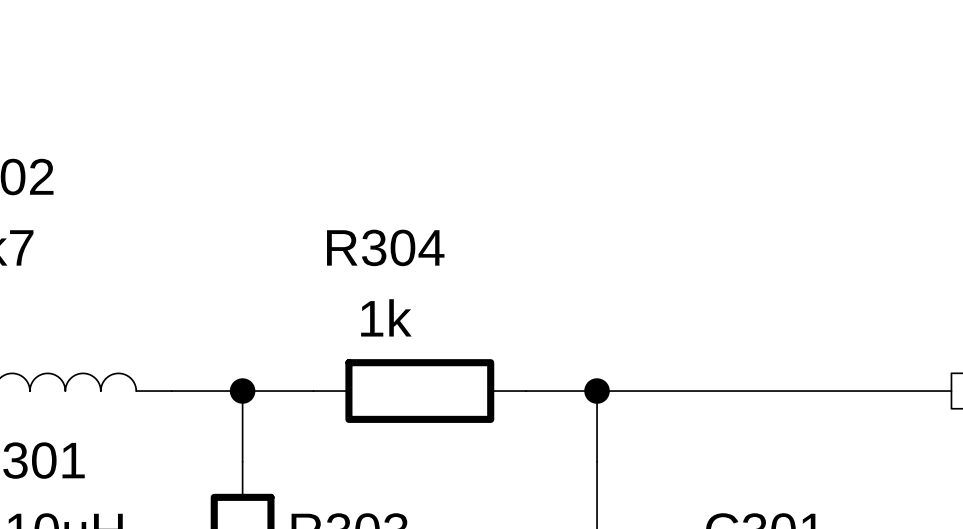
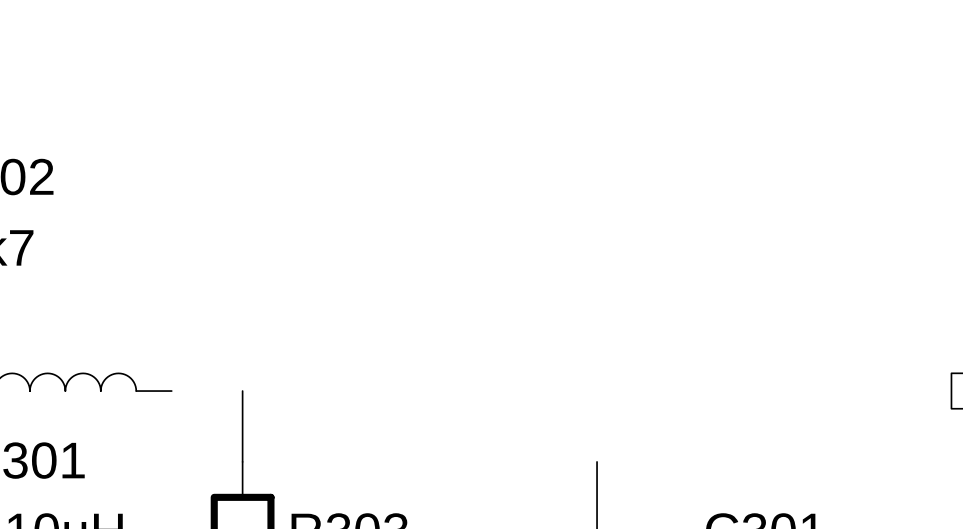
wire: (171, 391) (313, 391) -> none
junction: (242, 391) -> none
R304: 1k (419, 391) -> none
wire: (526, 391) (951, 391) -> none
wire: (597, 391) (597, 461) -> none
junction: (597, 391) -> none

